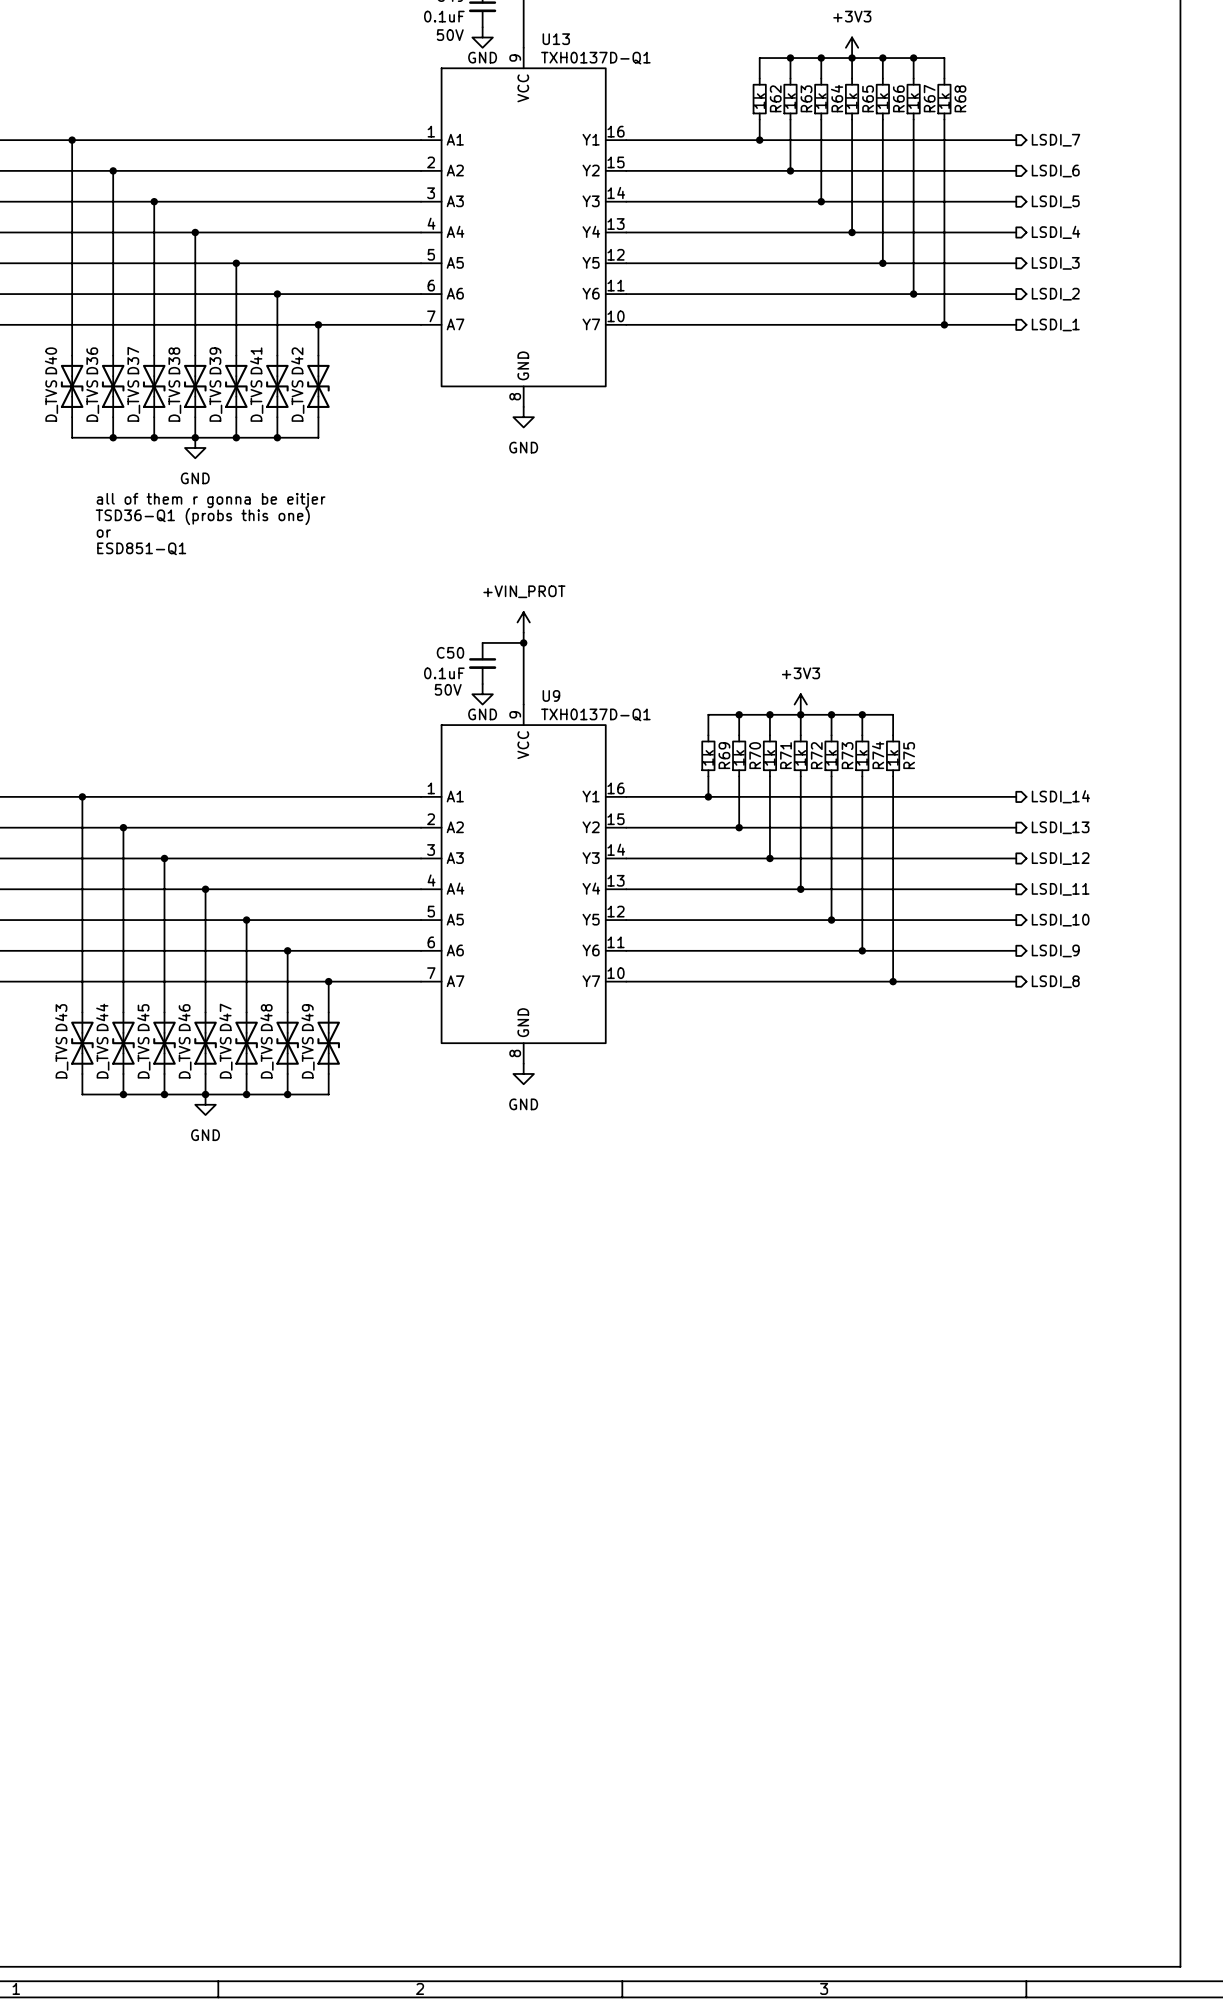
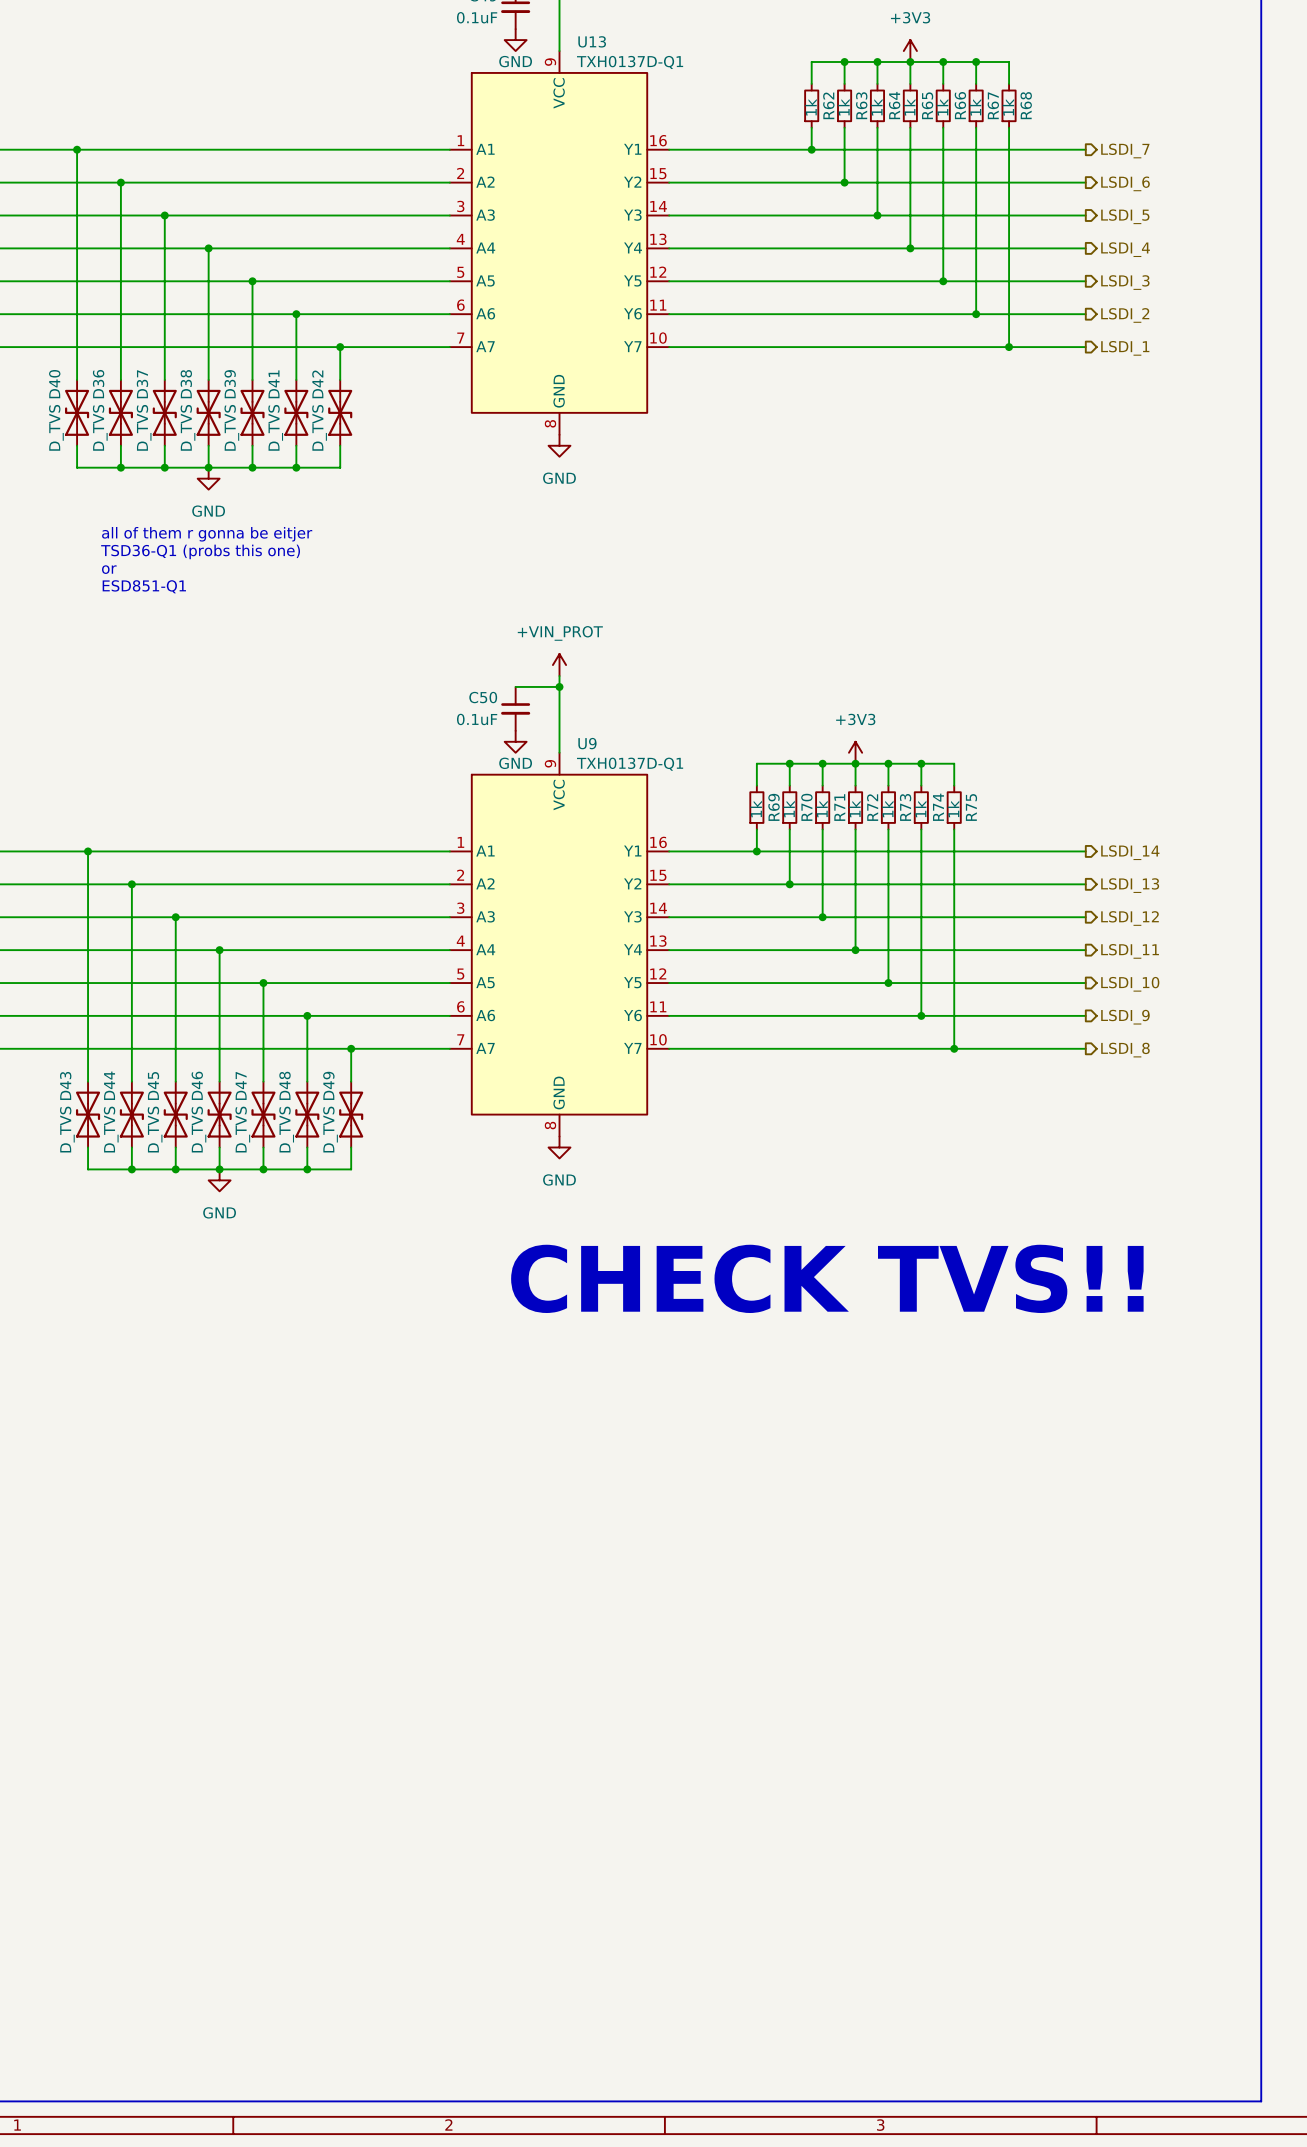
text: 50V (450, 35) -> none
text: 50V (448, 689) -> none
text: none -> CHECK TVS!! (827, 1278)

